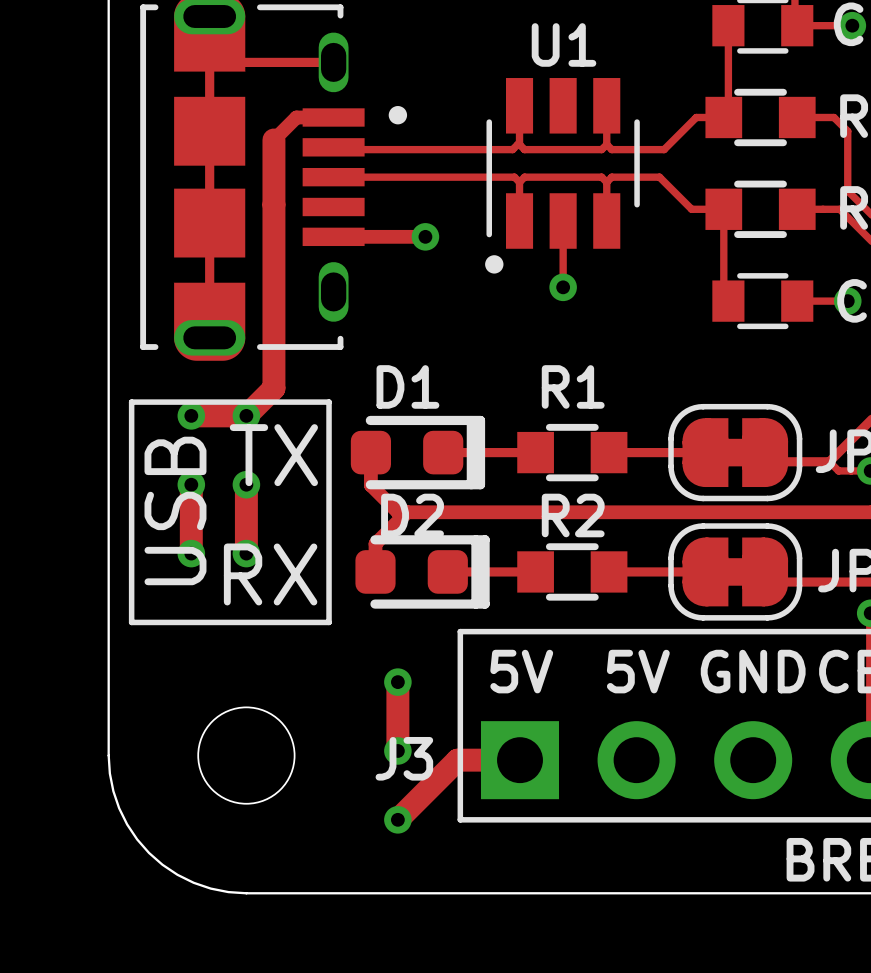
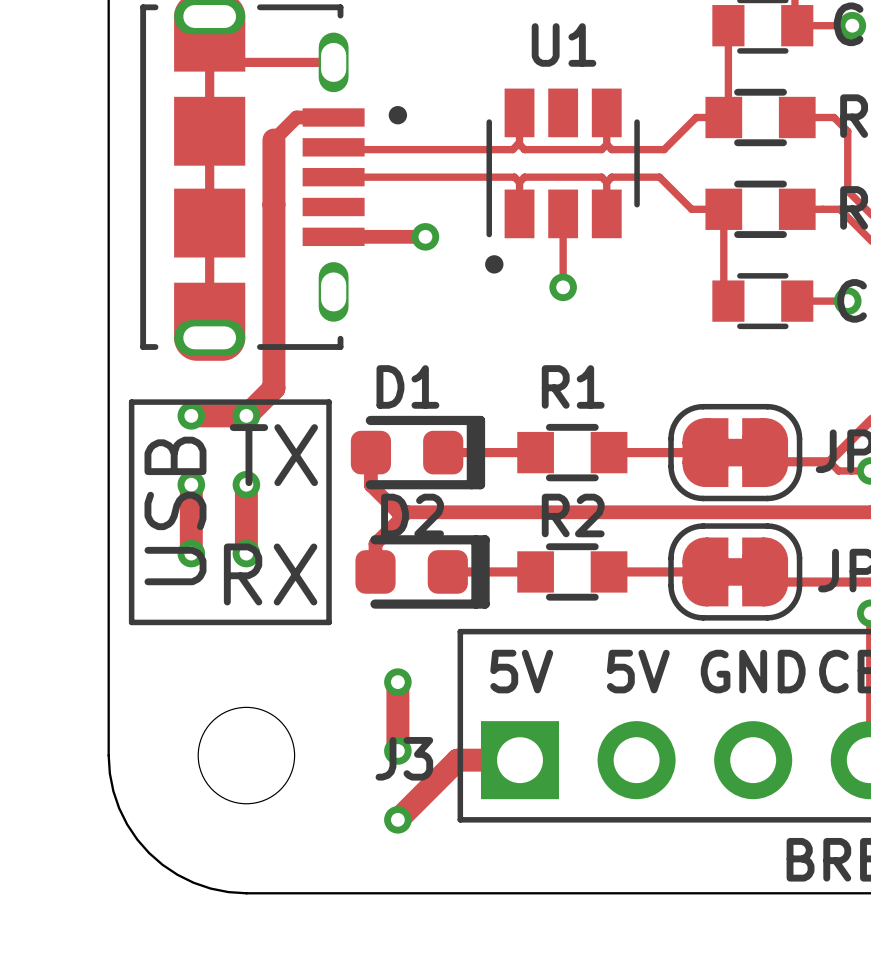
U1 footprint: [485, 78, 640, 274] -> [485, 88, 640, 274]

